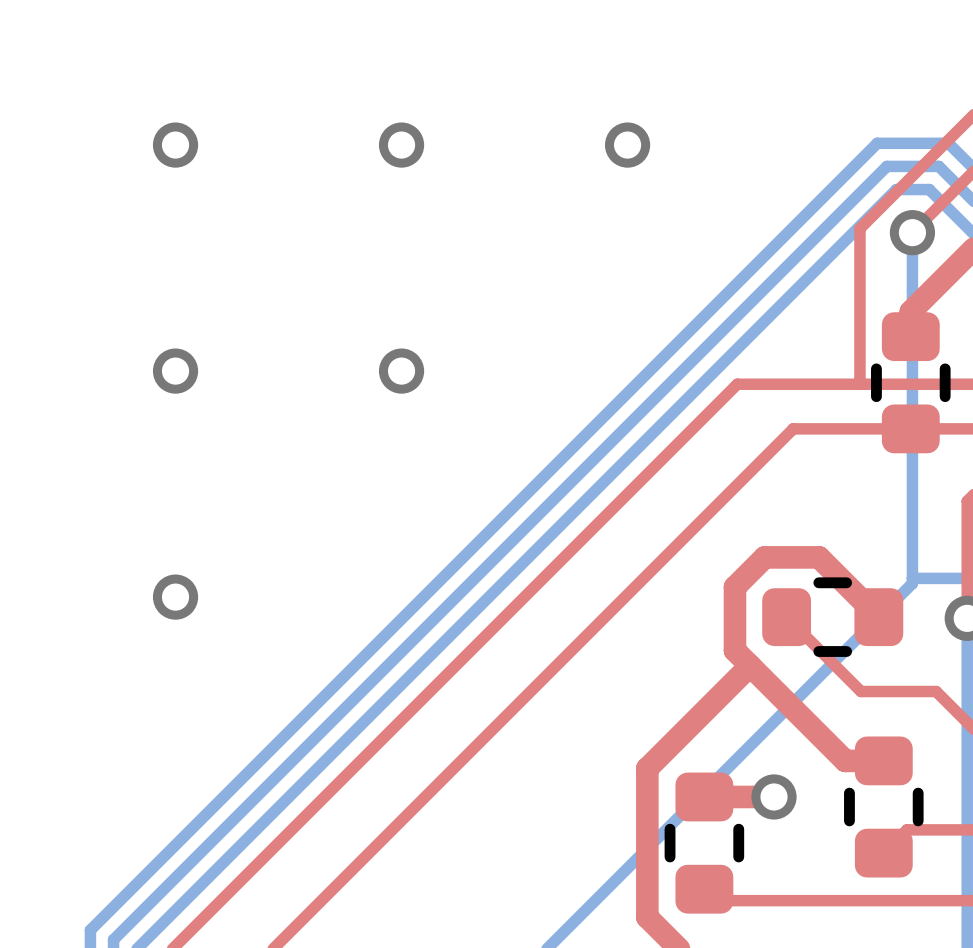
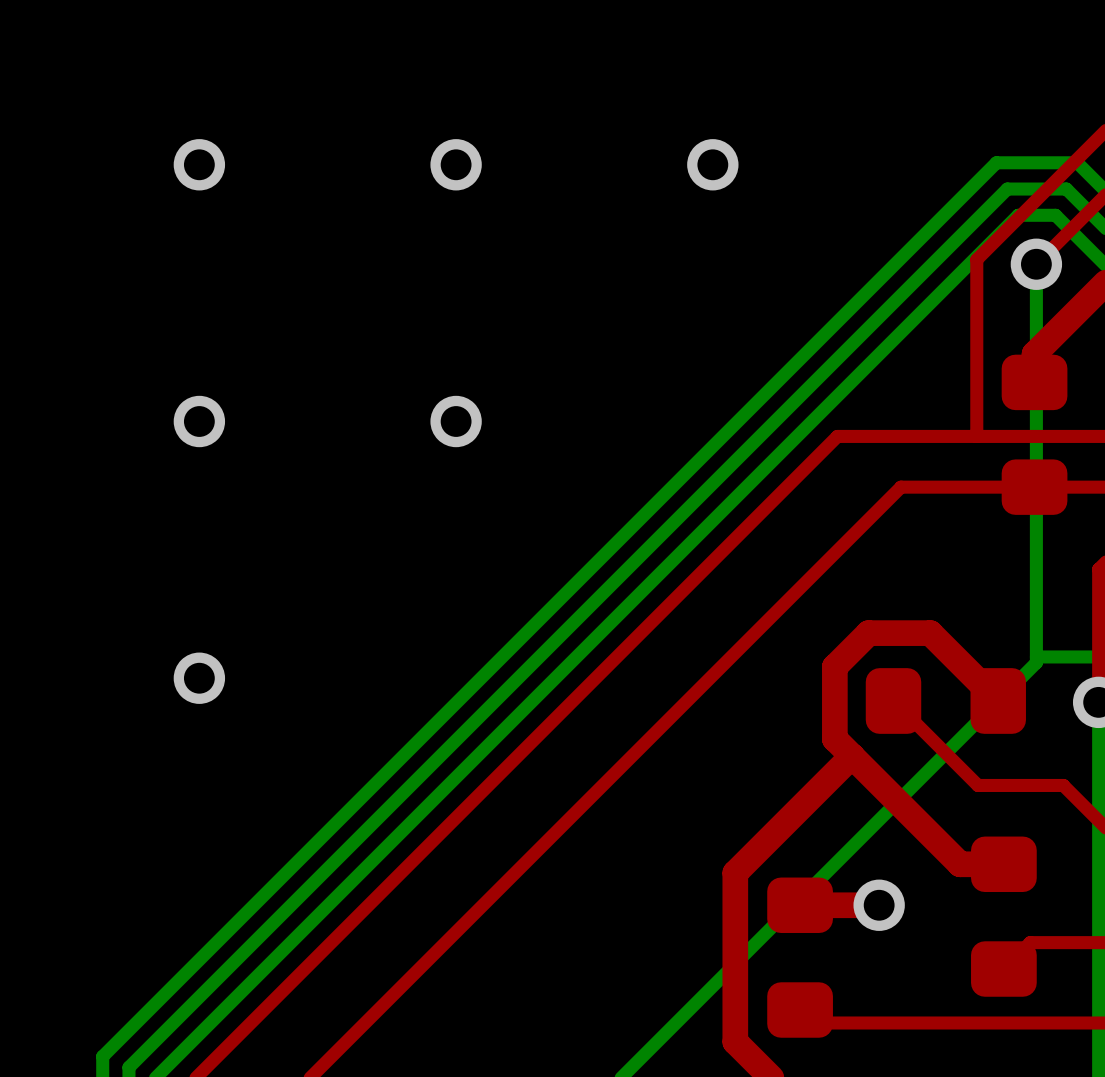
part footprint: [871, 312, 951, 454] -> [1001, 354, 1068, 515]
part footprint: [762, 577, 904, 657] -> [865, 668, 1026, 734]
part footprint: [844, 736, 924, 878] -> [971, 836, 1037, 997]
part footprint: [664, 772, 745, 914] -> [767, 877, 833, 1038]

